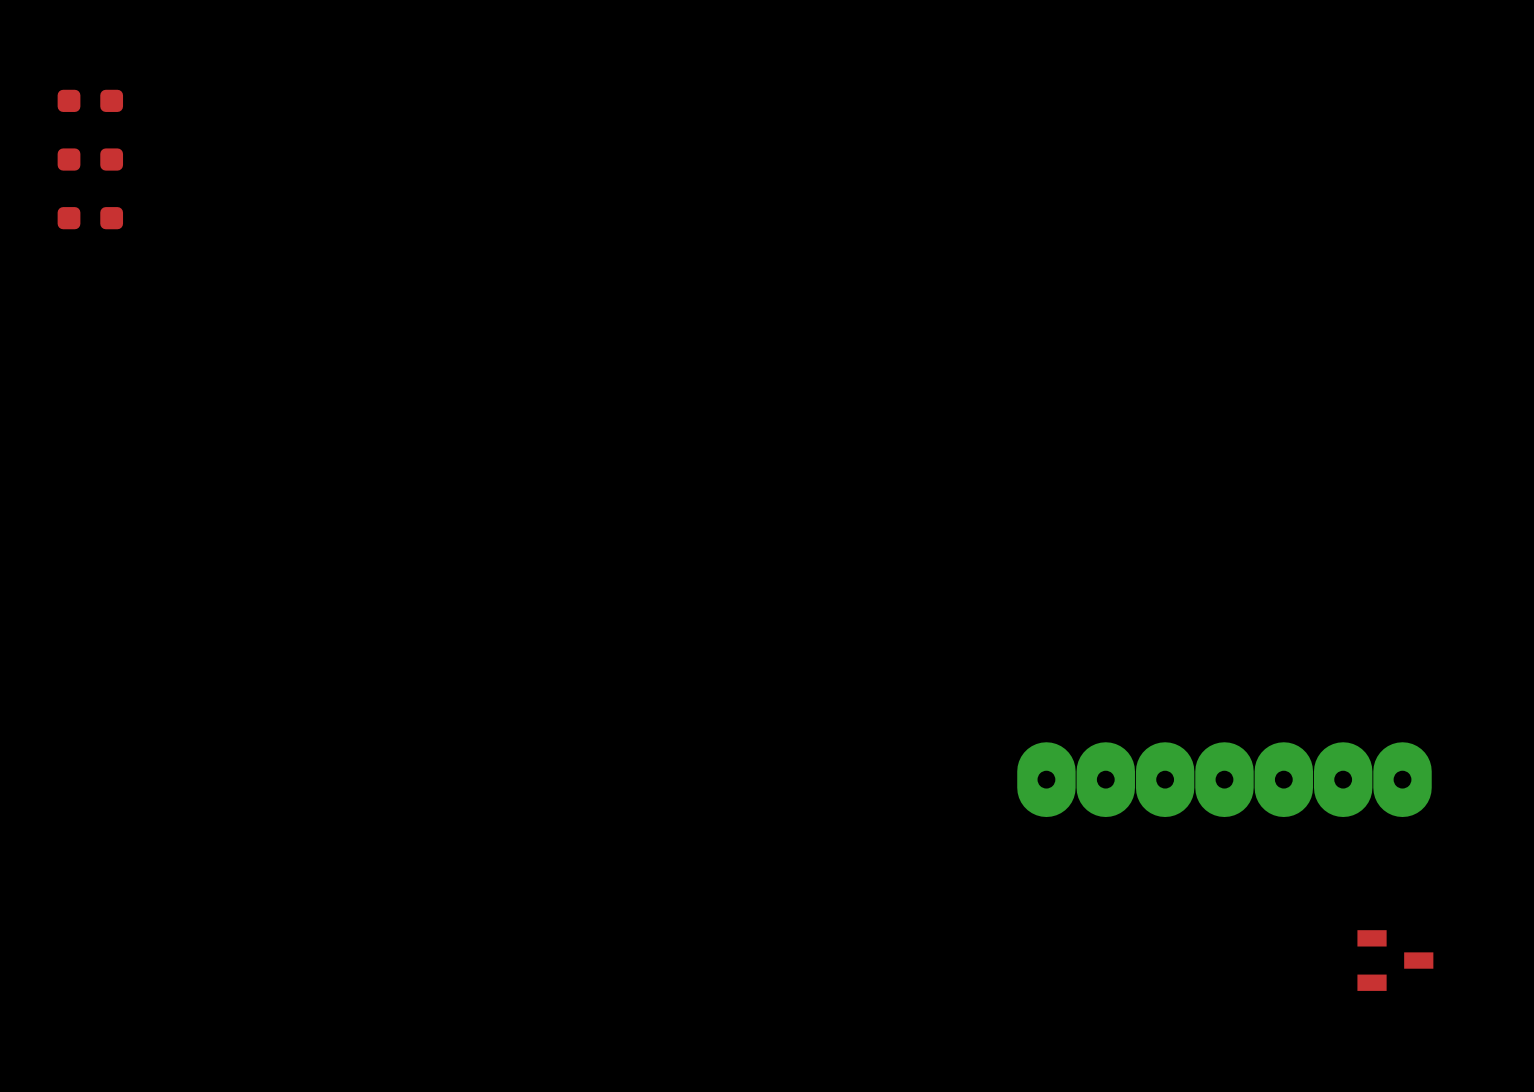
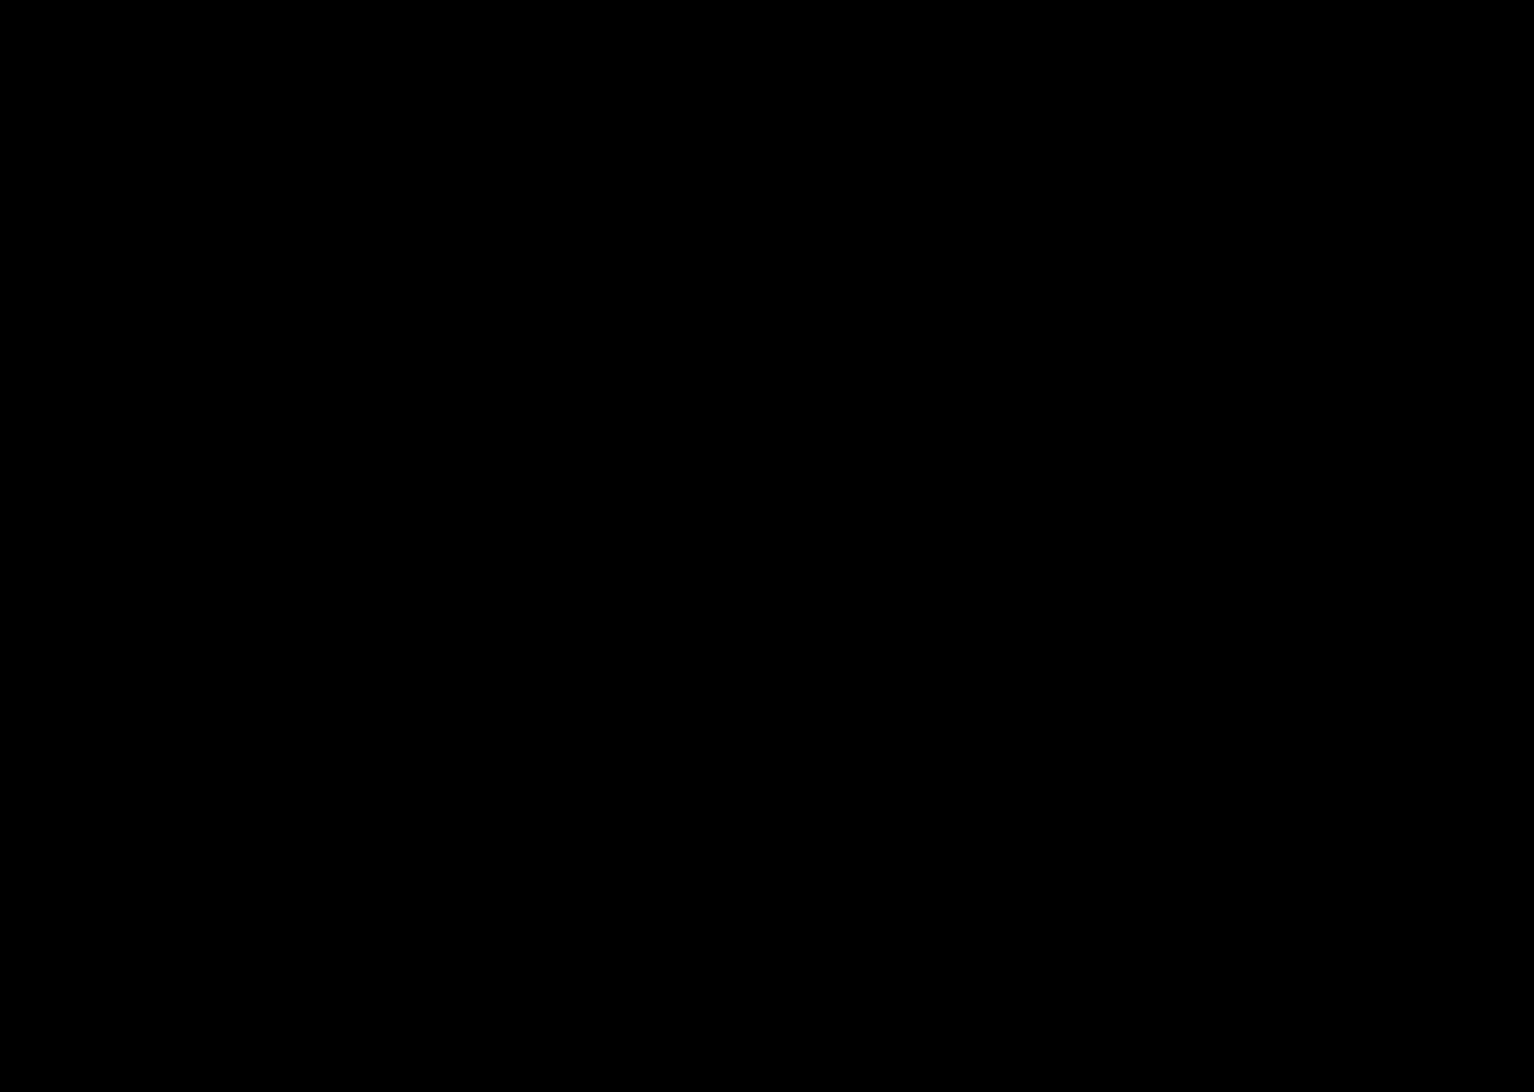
part: (90, 100) -> none
part: (90, 159) -> none
part: (90, 218) -> none
part: (1224, 779) -> none
part: (1395, 960) -> none

